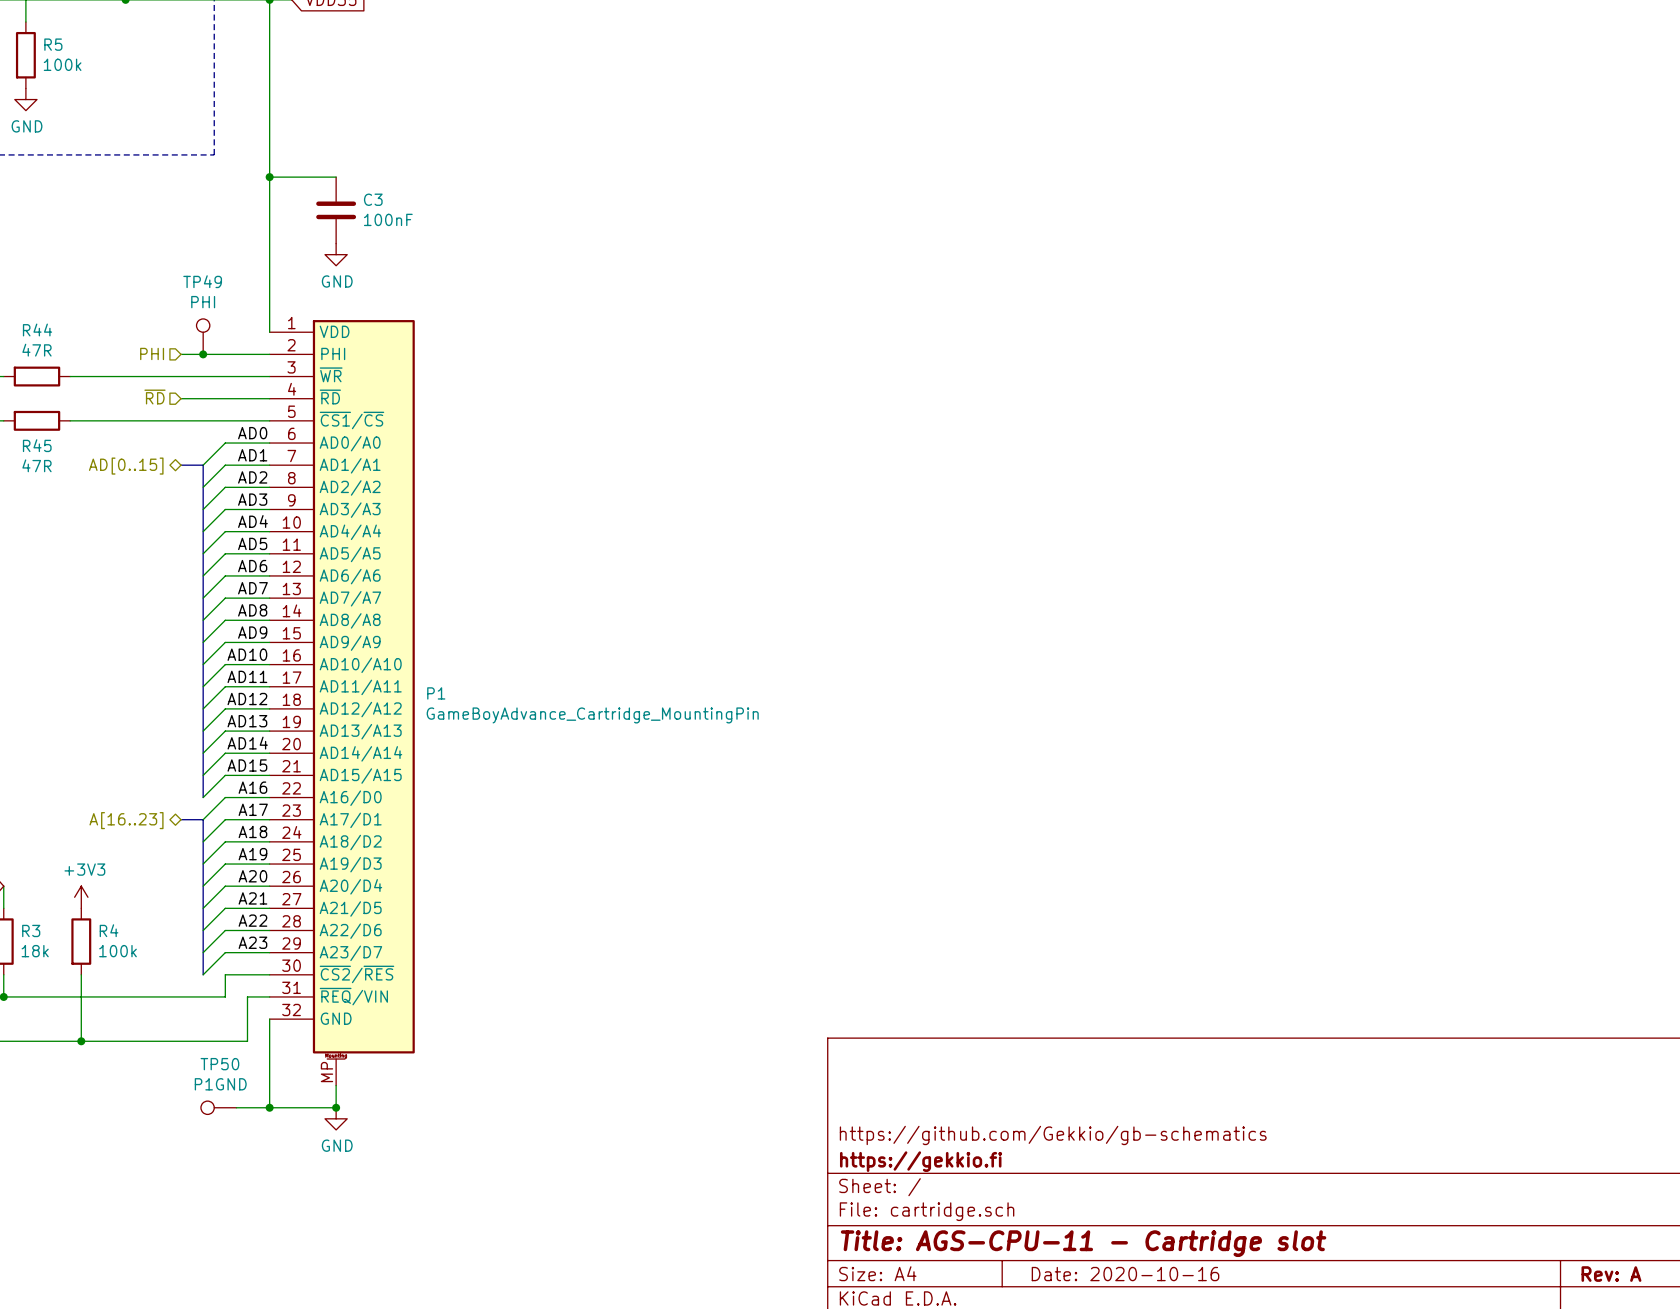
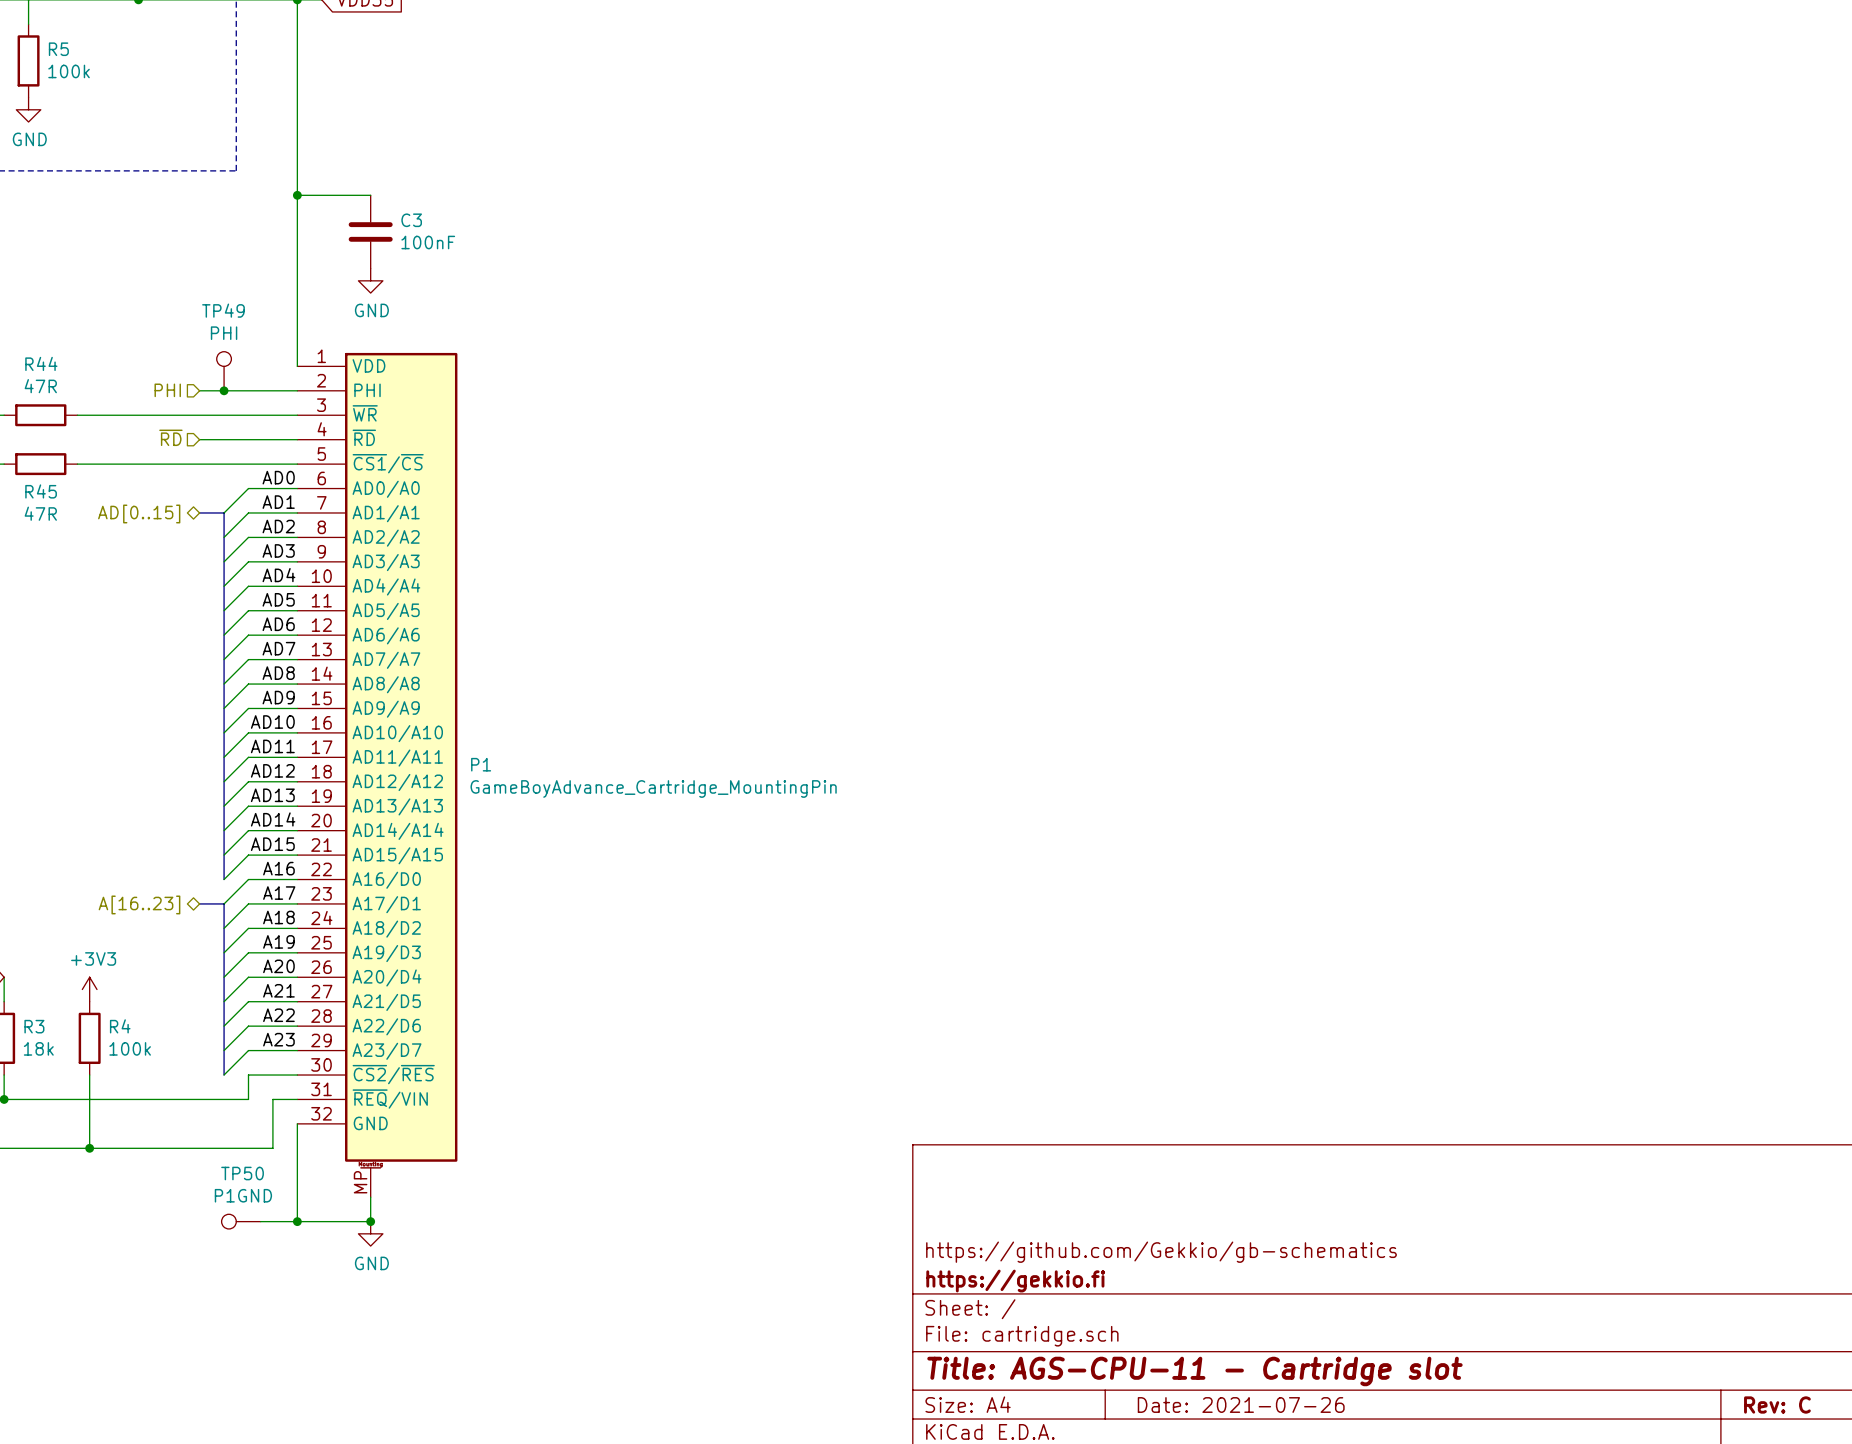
title block: Date: 2020-10-16 (1125, 1274) -> Date: 2021-07-26 (1241, 1405)
title block: Rev: A (1611, 1274) -> Rev: C (1777, 1405)

